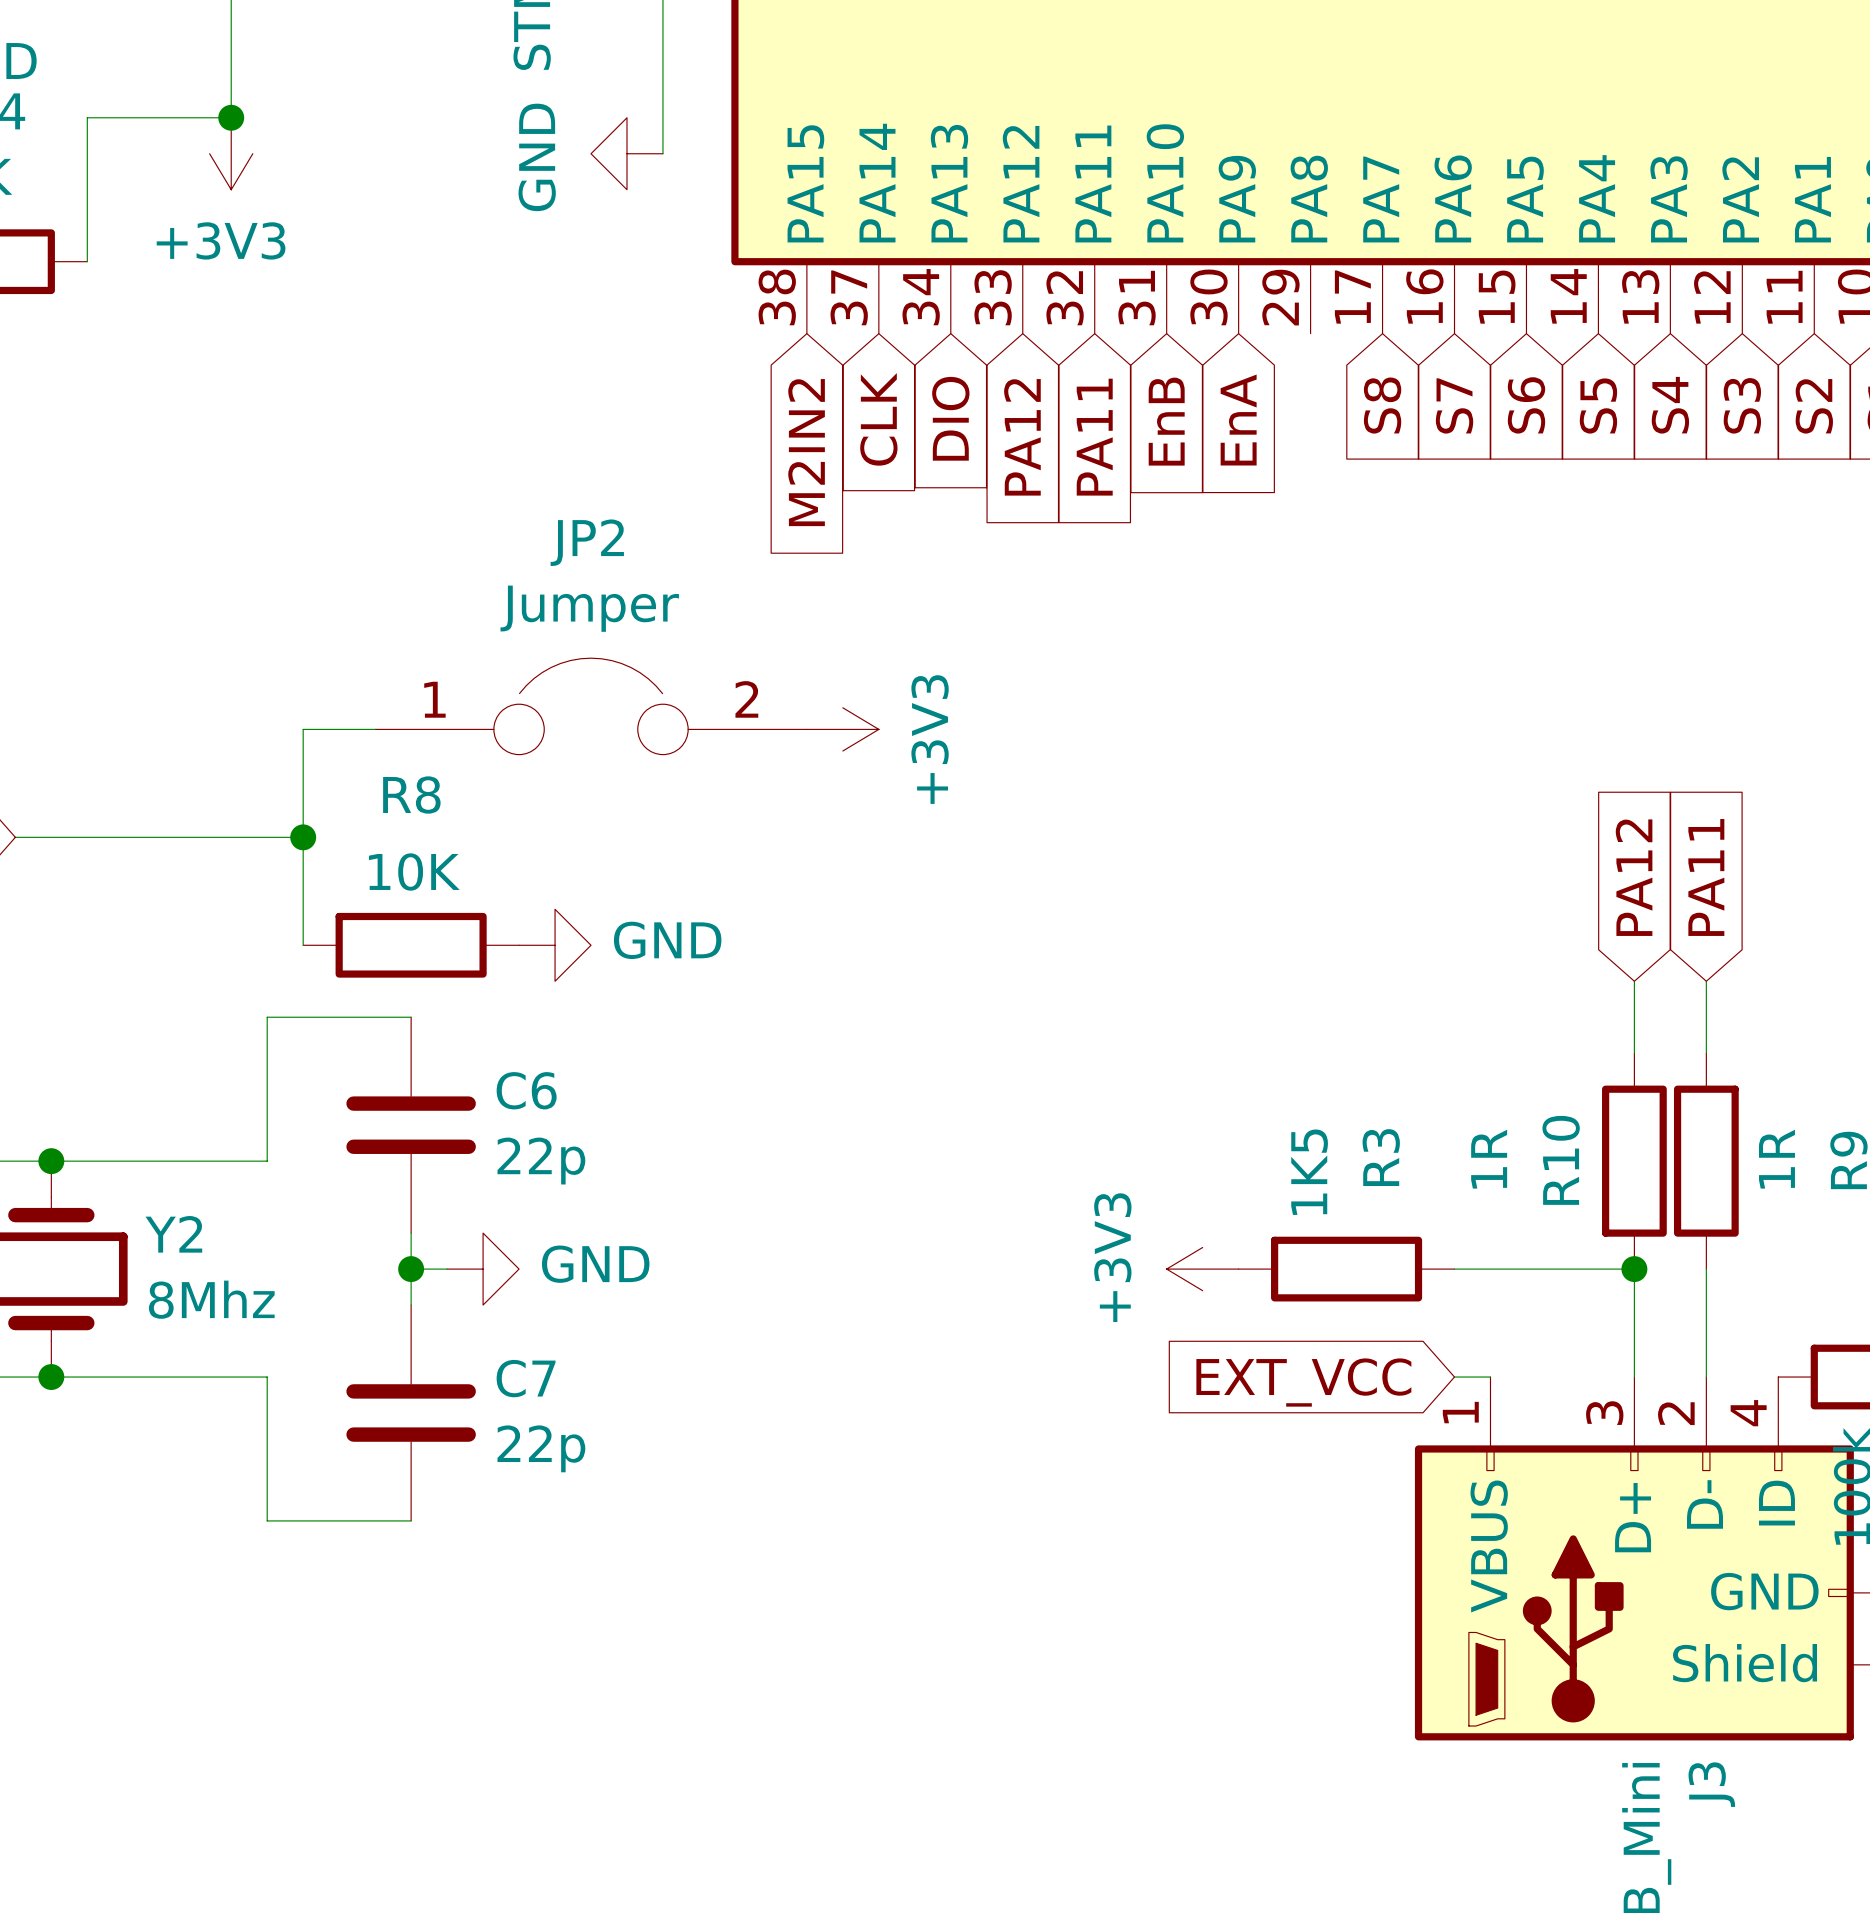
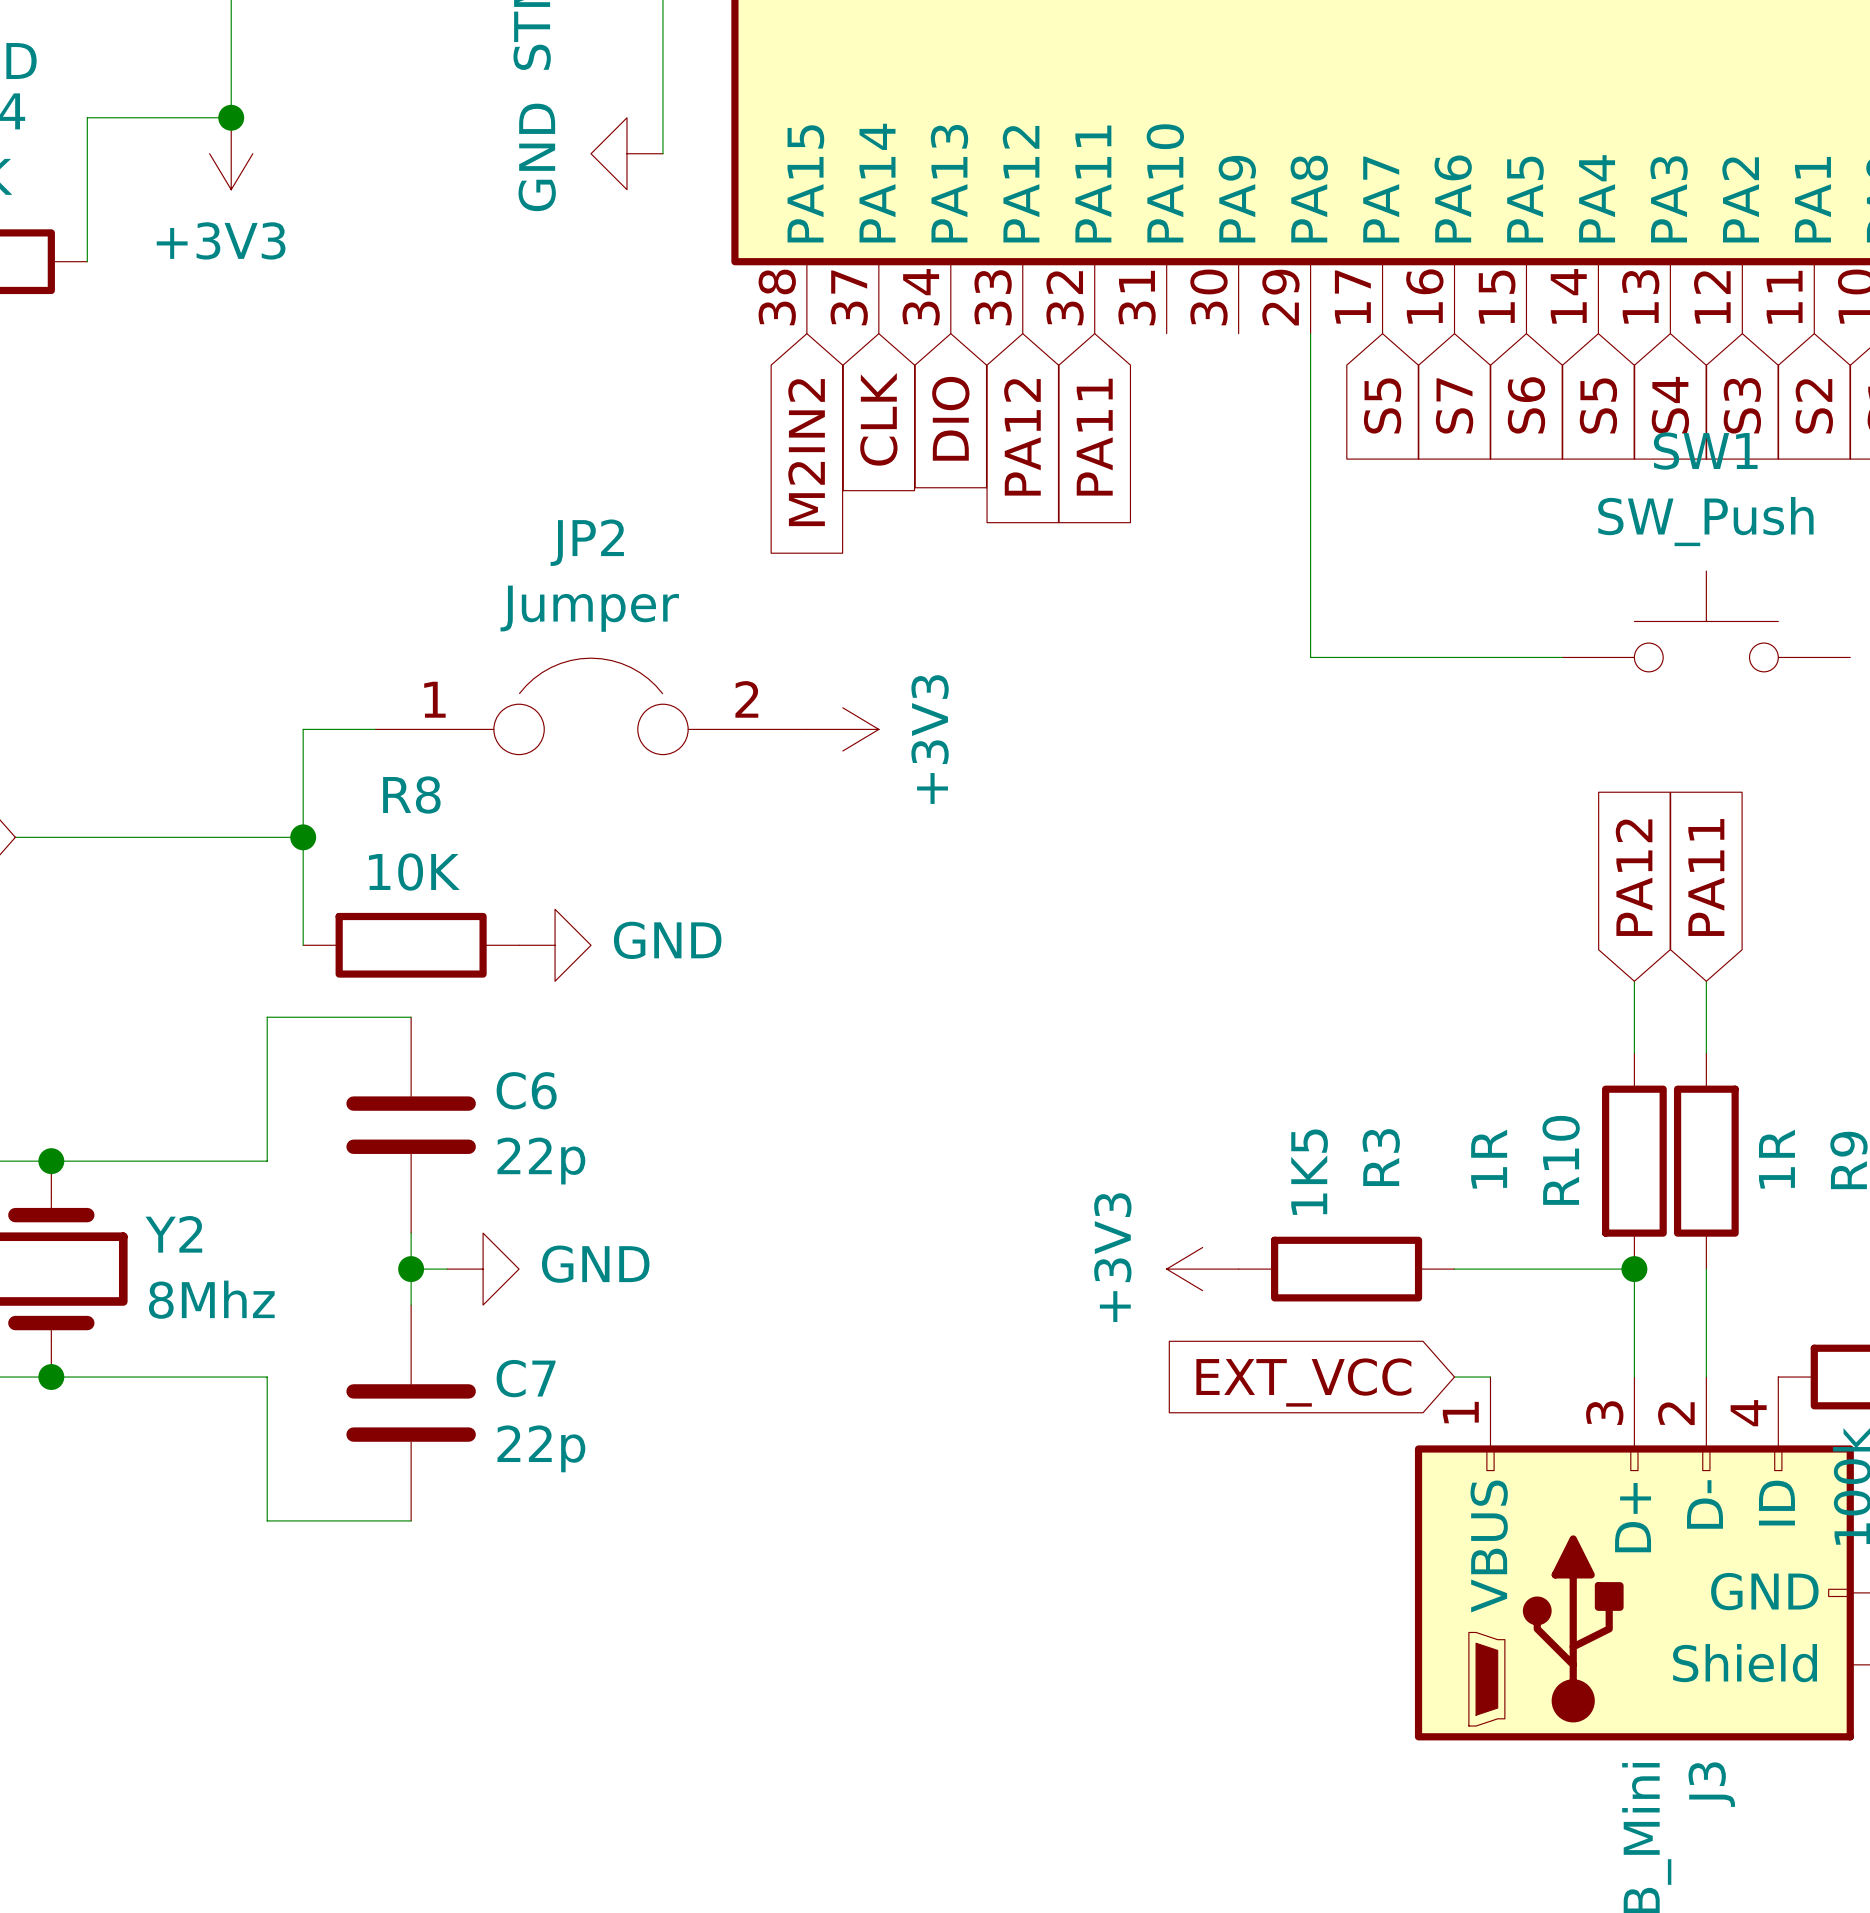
wire: none -> (1310, 333) (1310, 657) (1562, 657)
global label: S8 (1382, 405) -> S5 (1382, 406)
global label: EnA (1238, 420) -> none
global label: EnB (1166, 421) -> none
SW1: none -> SW_Push (1706, 621)

